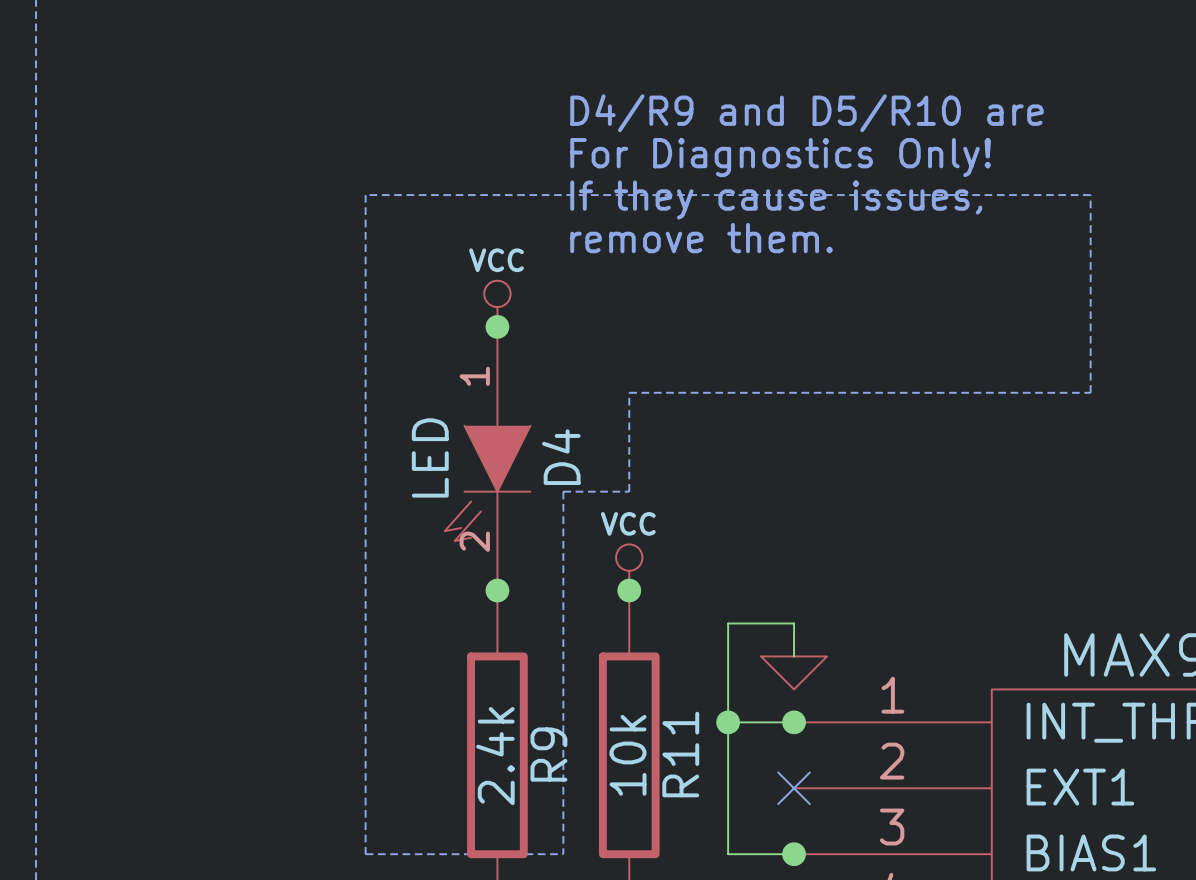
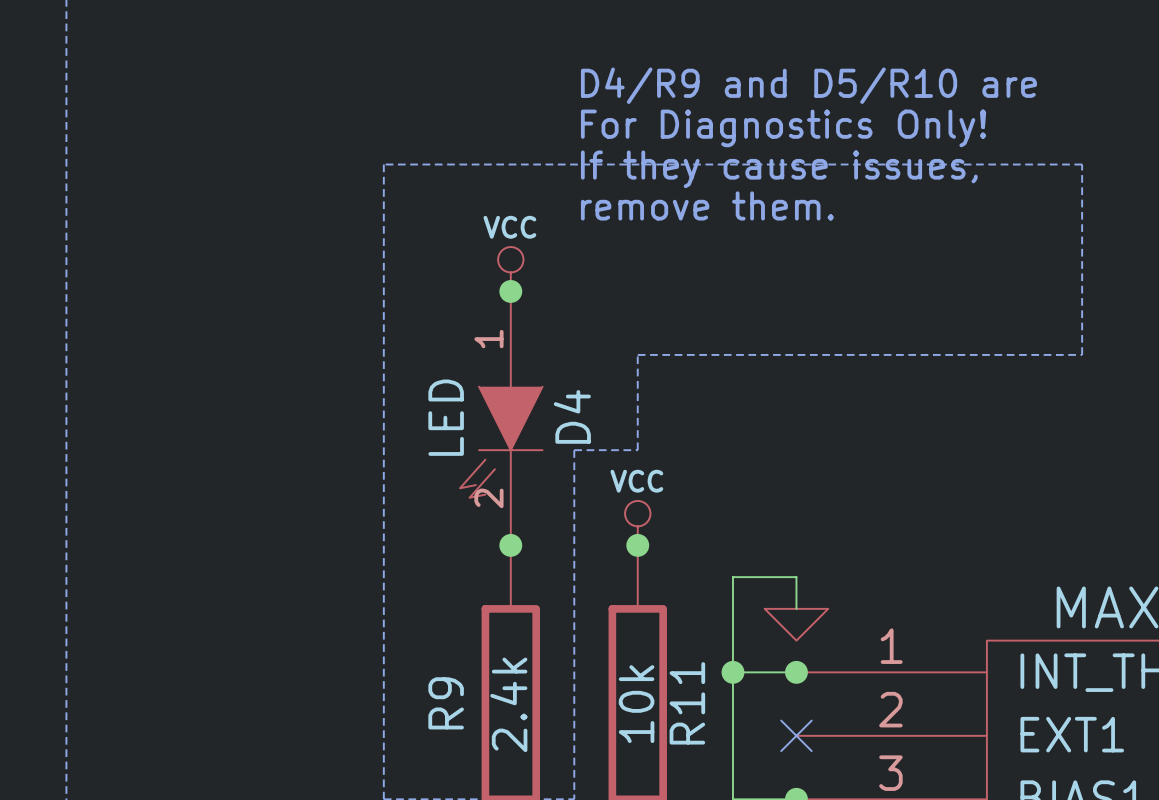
R9 name position: R9 (548, 754) -> R9 (446, 703)

